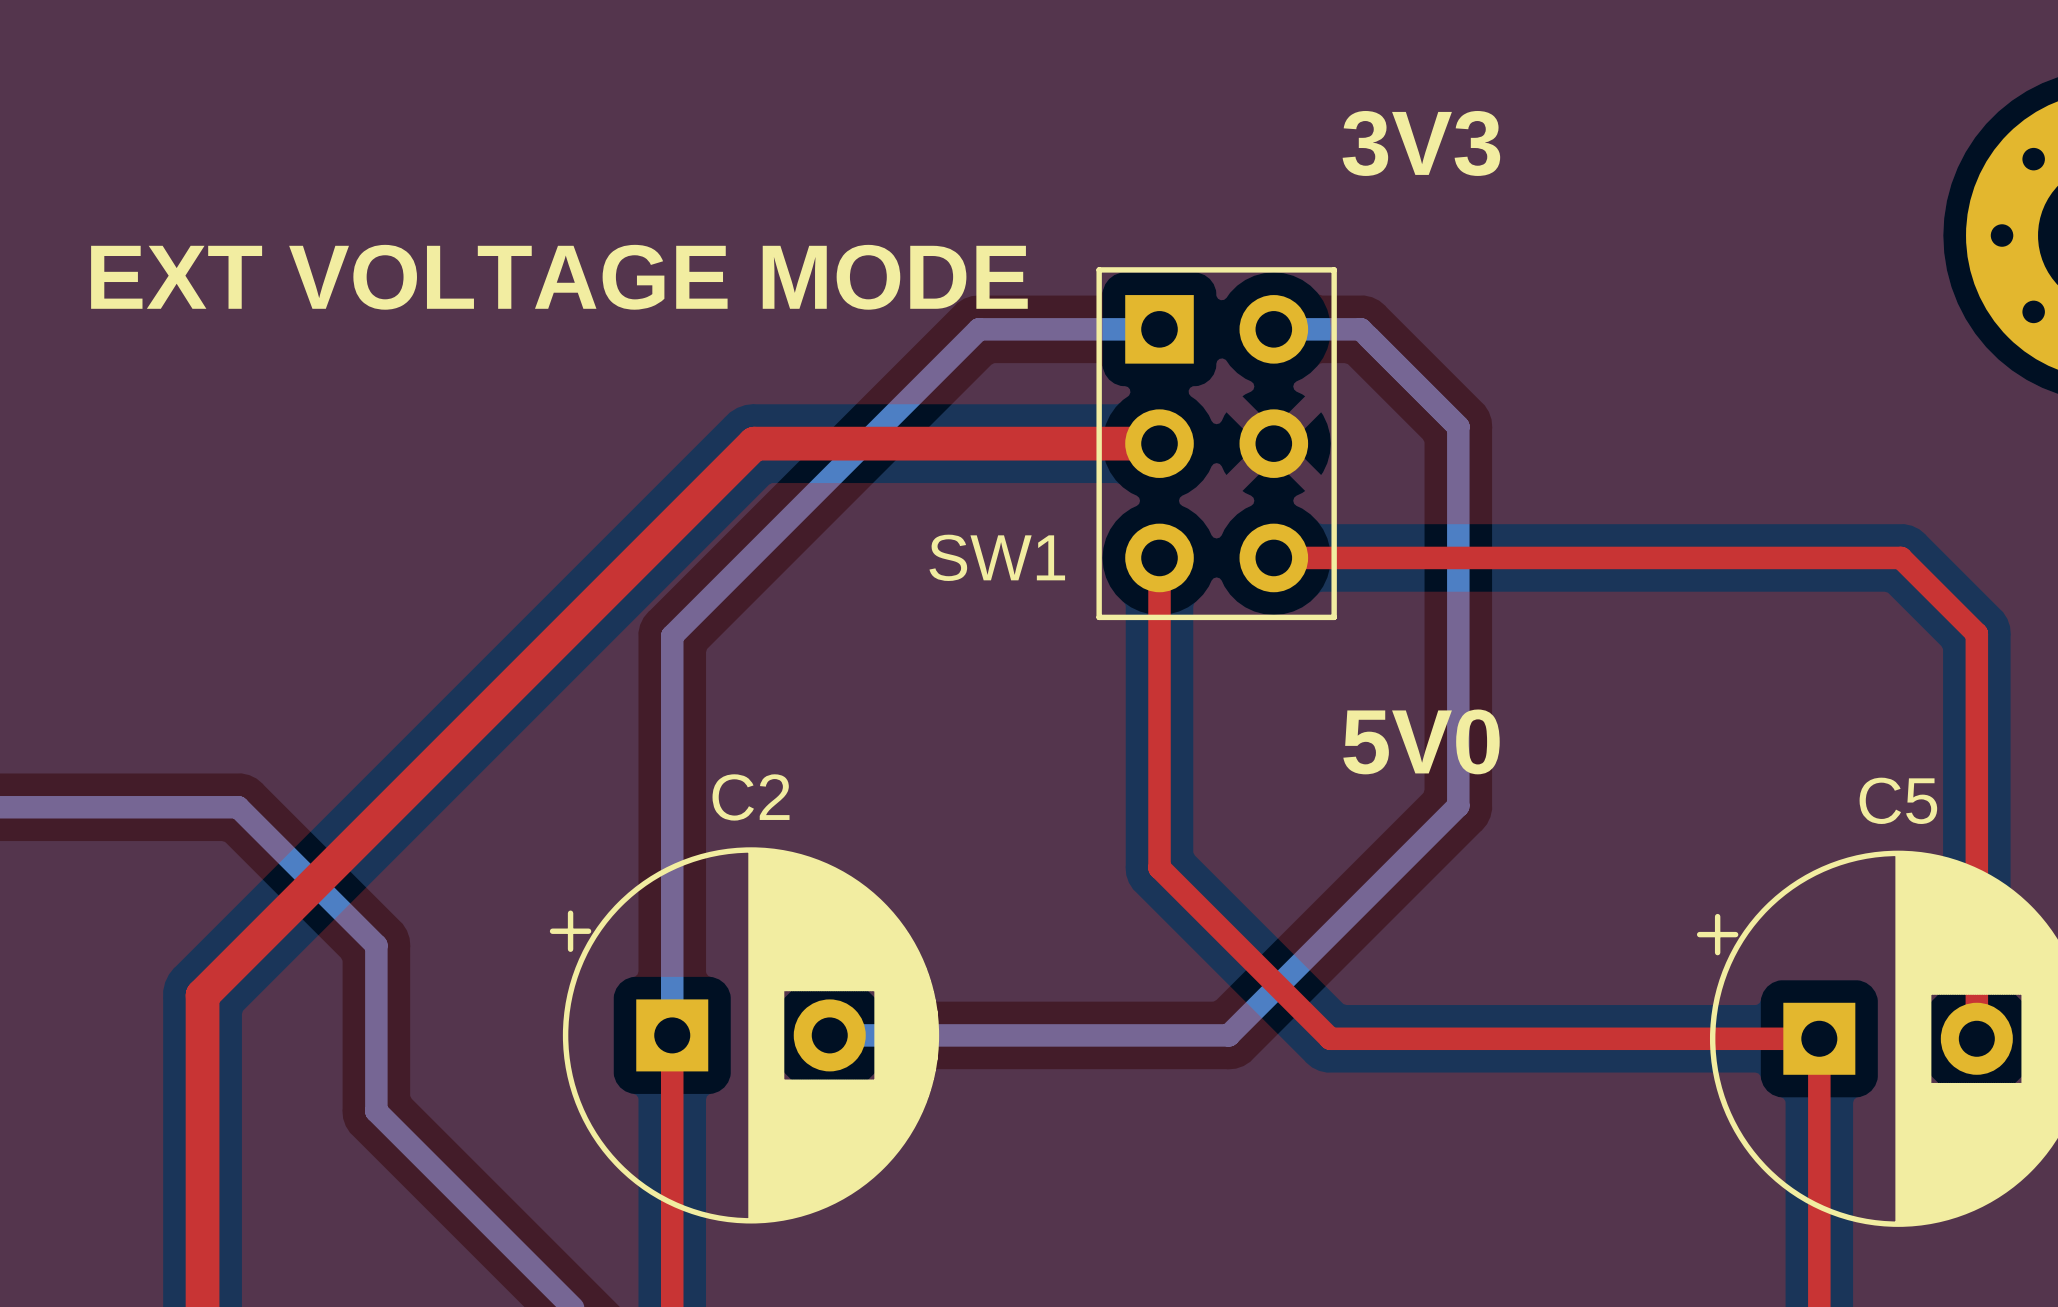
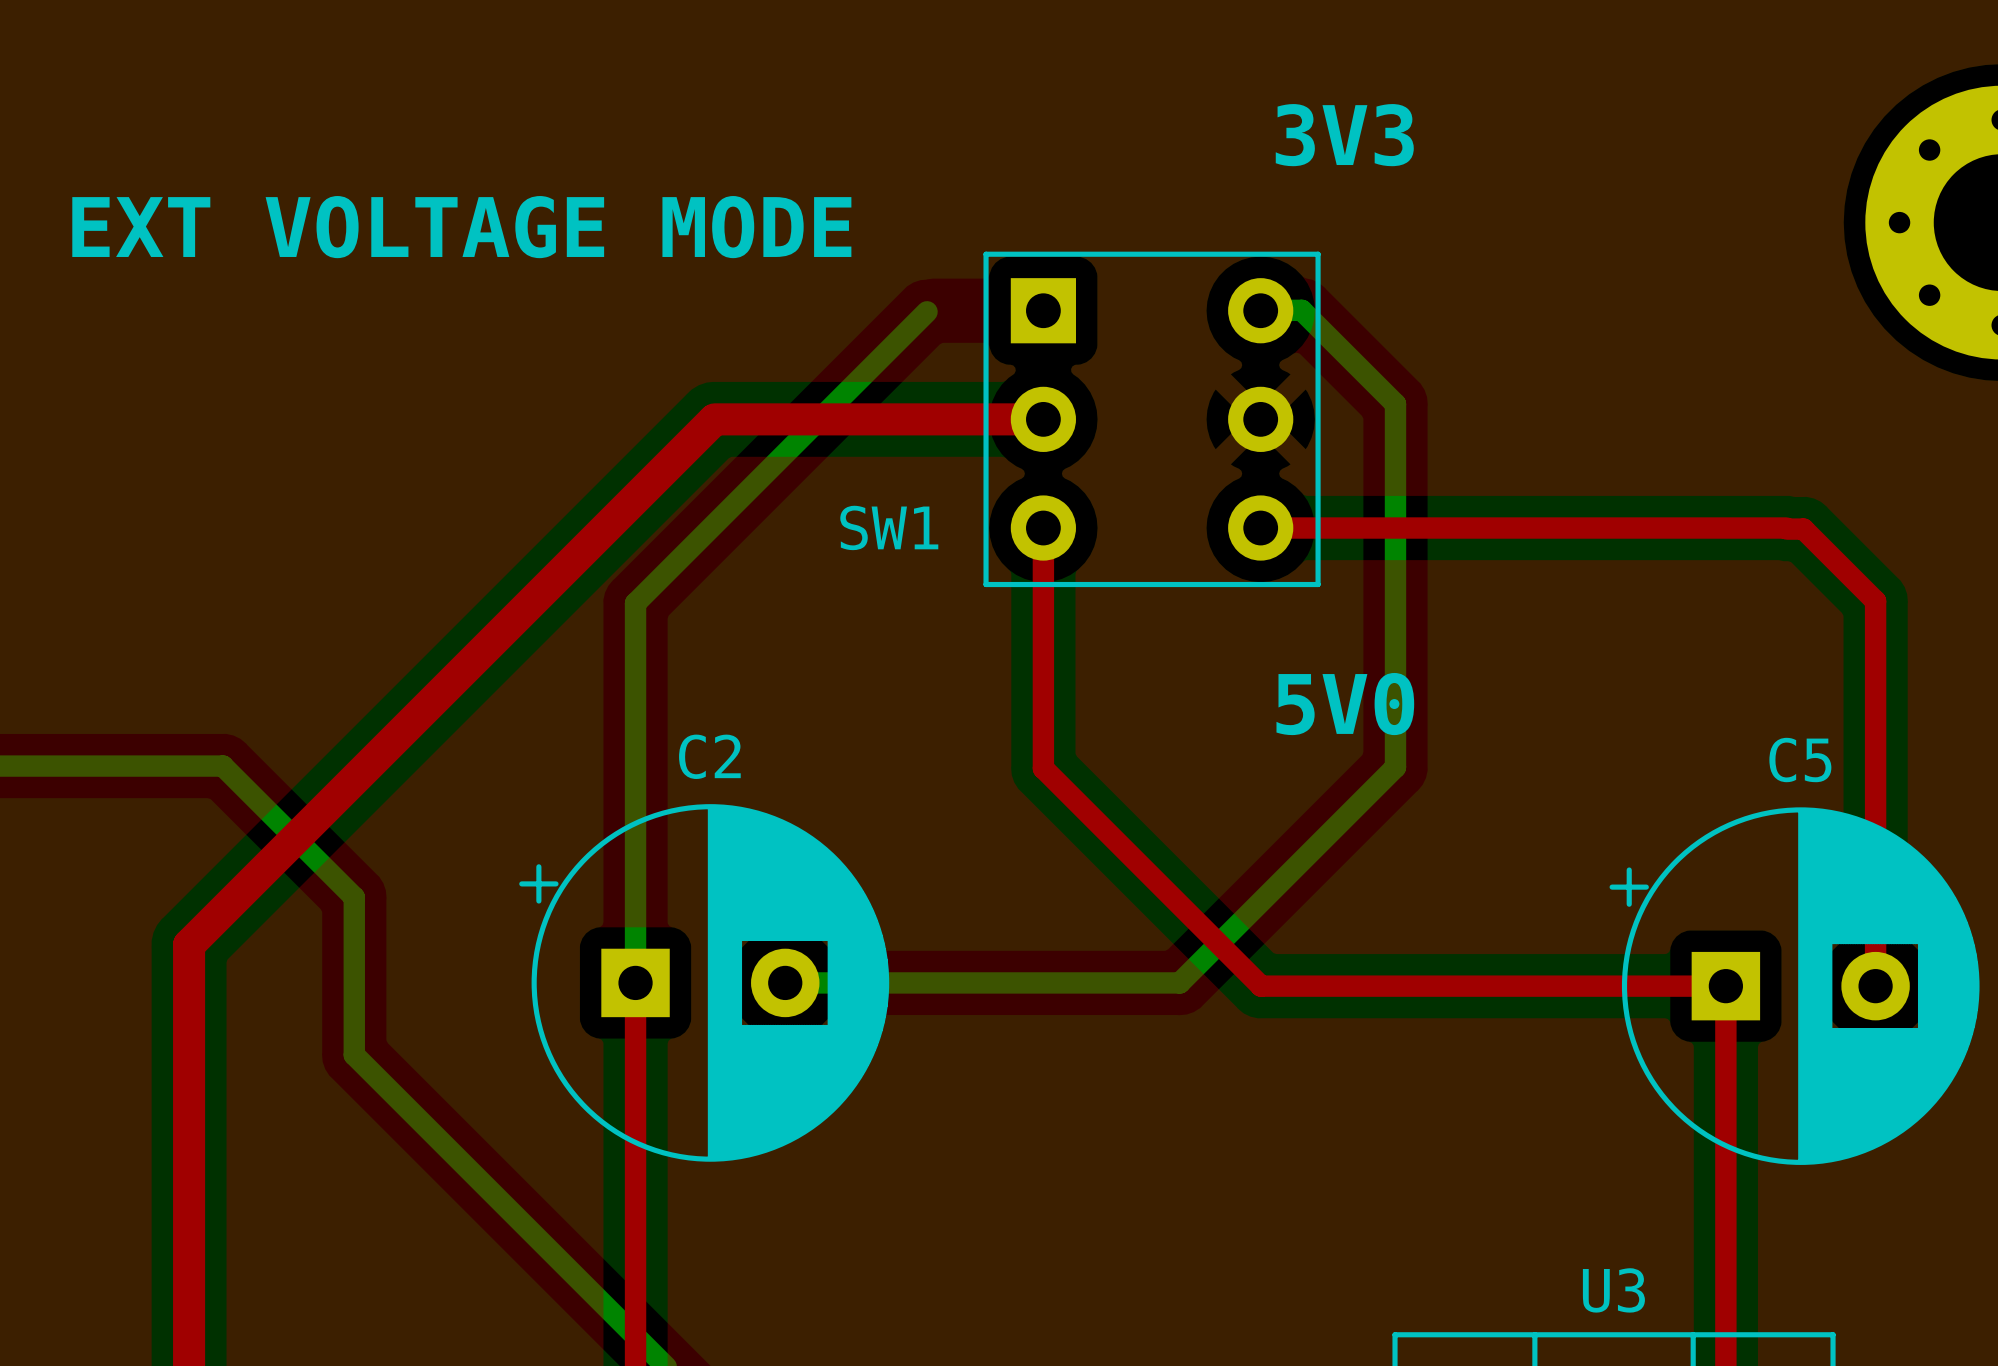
SW1 footprint: [1096, 267, 1337, 621] -> [983, 251, 1321, 588]
text position: EXT VOLTAGE MODE (559, 277) -> EXT VOLTAGE MODE (461, 227)
bottom track: (978, 329) (1159, 329) -> none
bottom track: (1273, 329) (1360, 329) (1458, 426) (1458, 805) (1228, 1035) -> (1261, 310) (1301, 310) (1395, 404) (1395, 767) (1179, 982) (1164, 982)
top track: (754, 443) (1159, 443) -> (713, 420) (1043, 419)
top track: (1159, 557) (1159, 867) -> (1043, 528) (1043, 768) (1098, 823)
top track: (1273, 557) (1883, 557) -> (1260, 528) (1787, 529)

